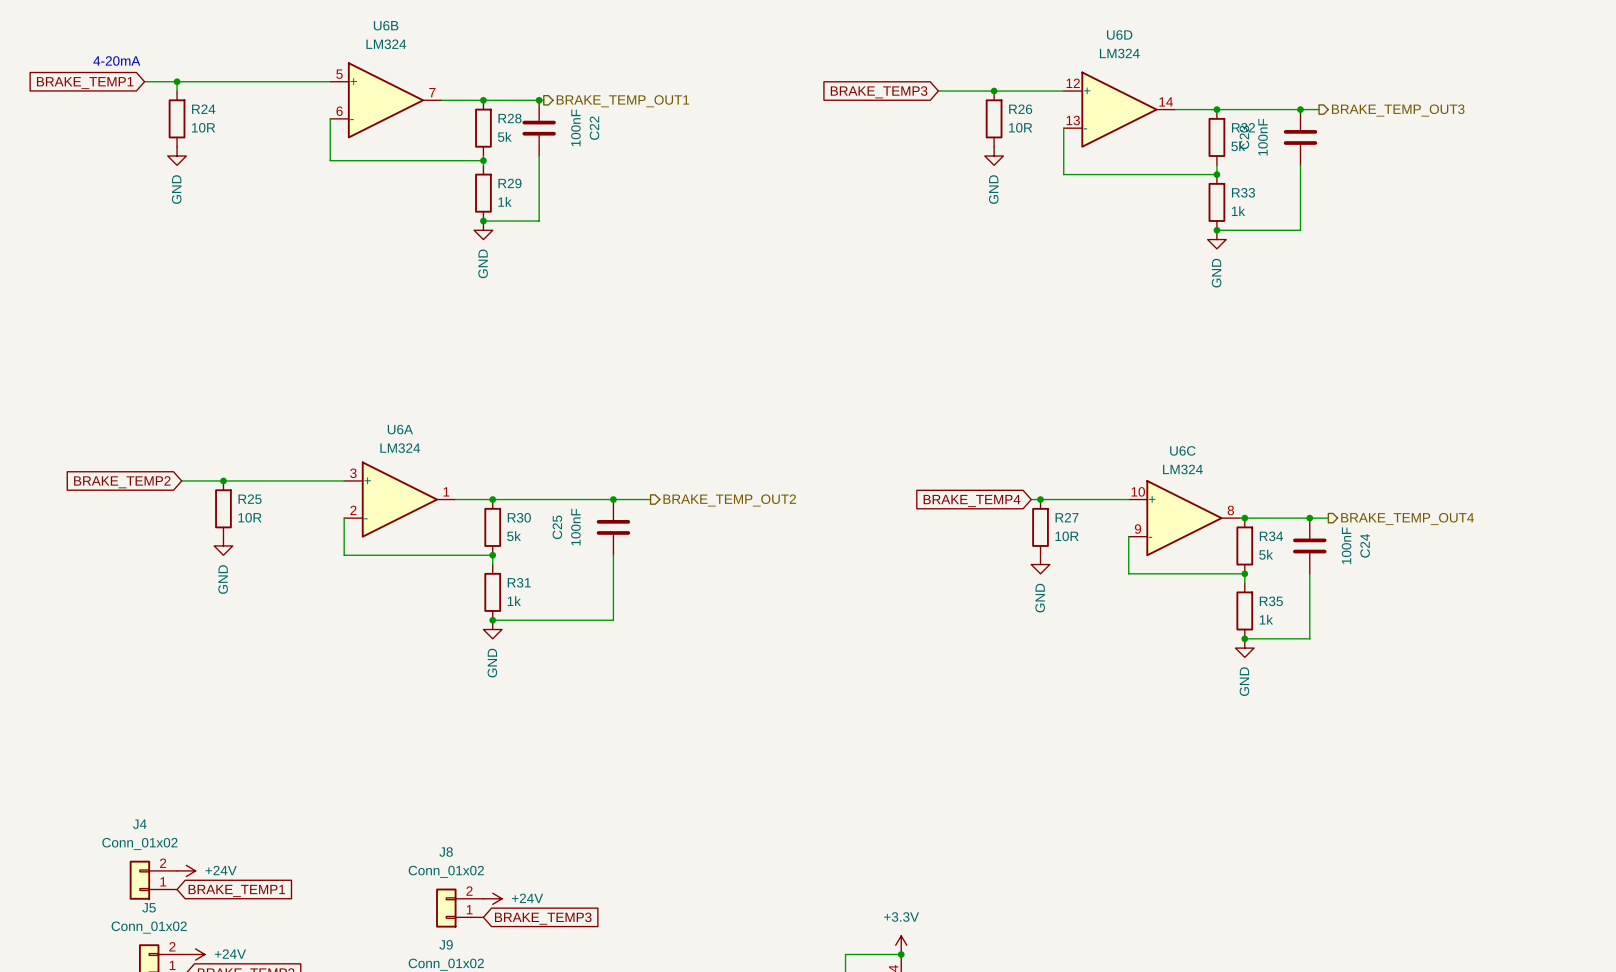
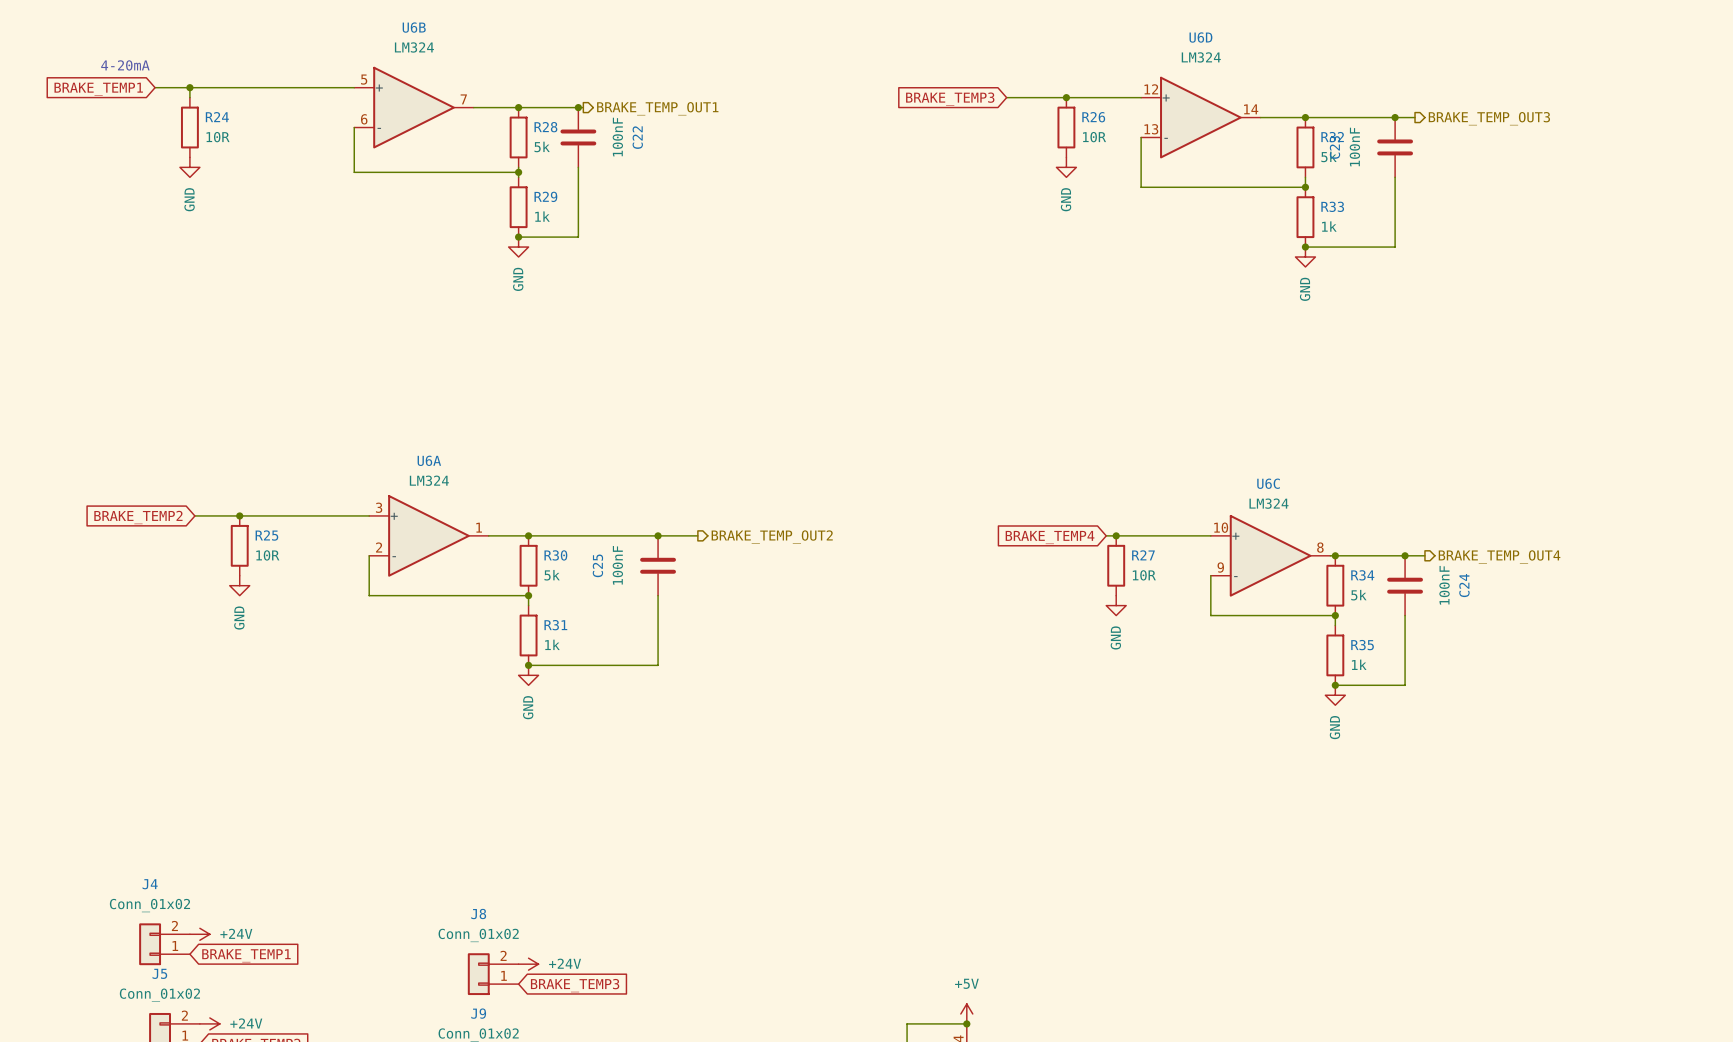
power symbol: +3.3V (901, 945) -> +5V (966, 1013)

